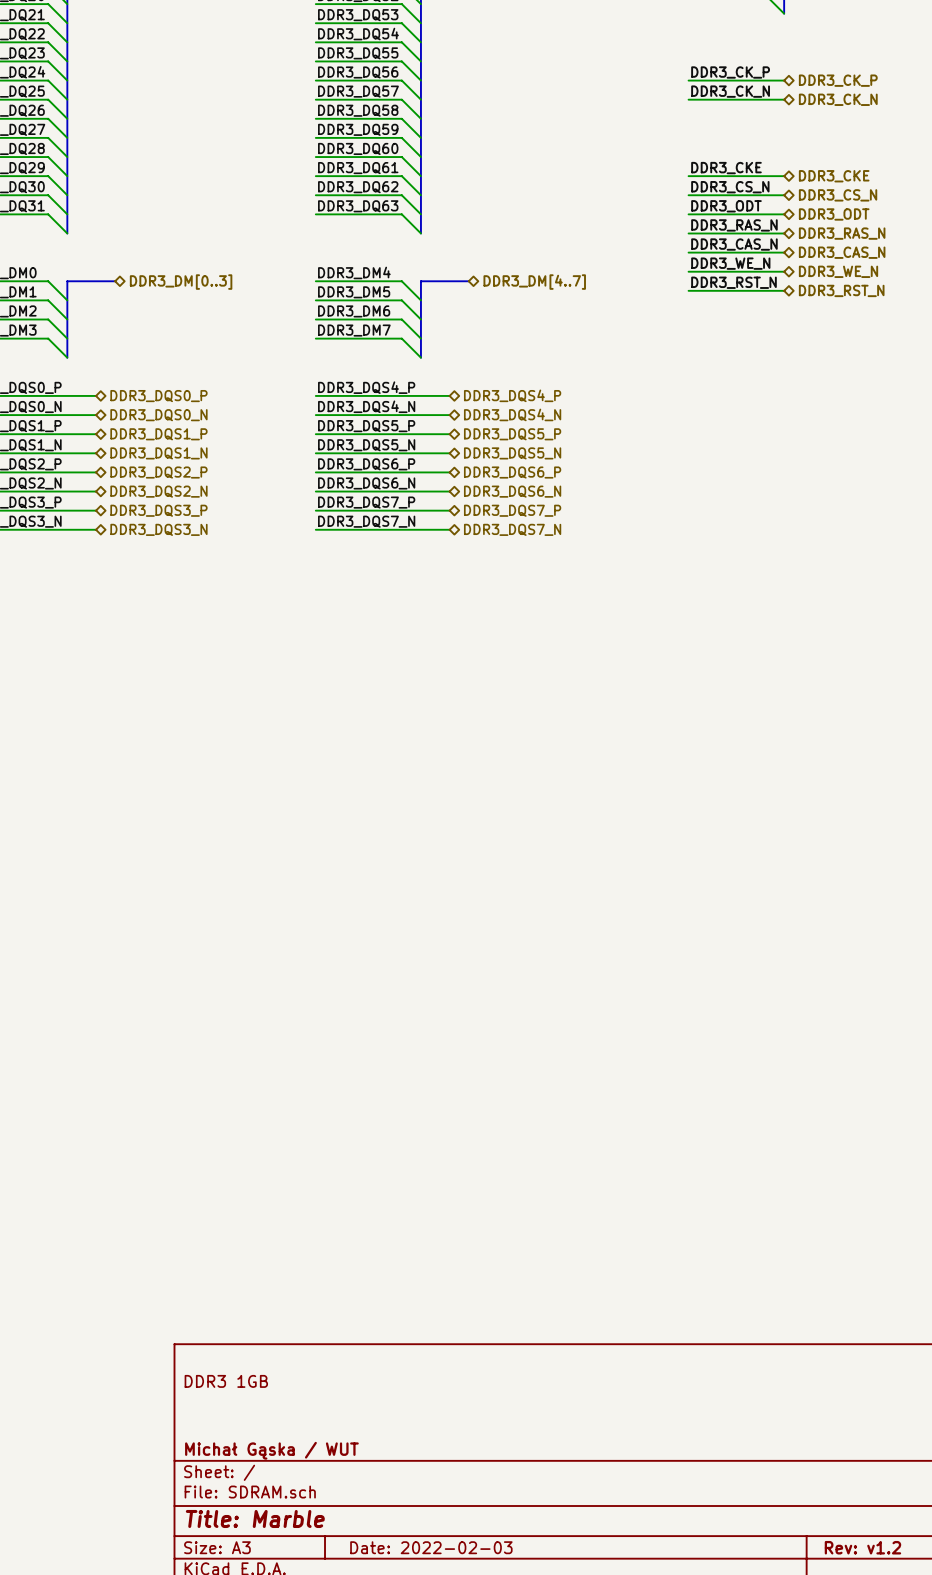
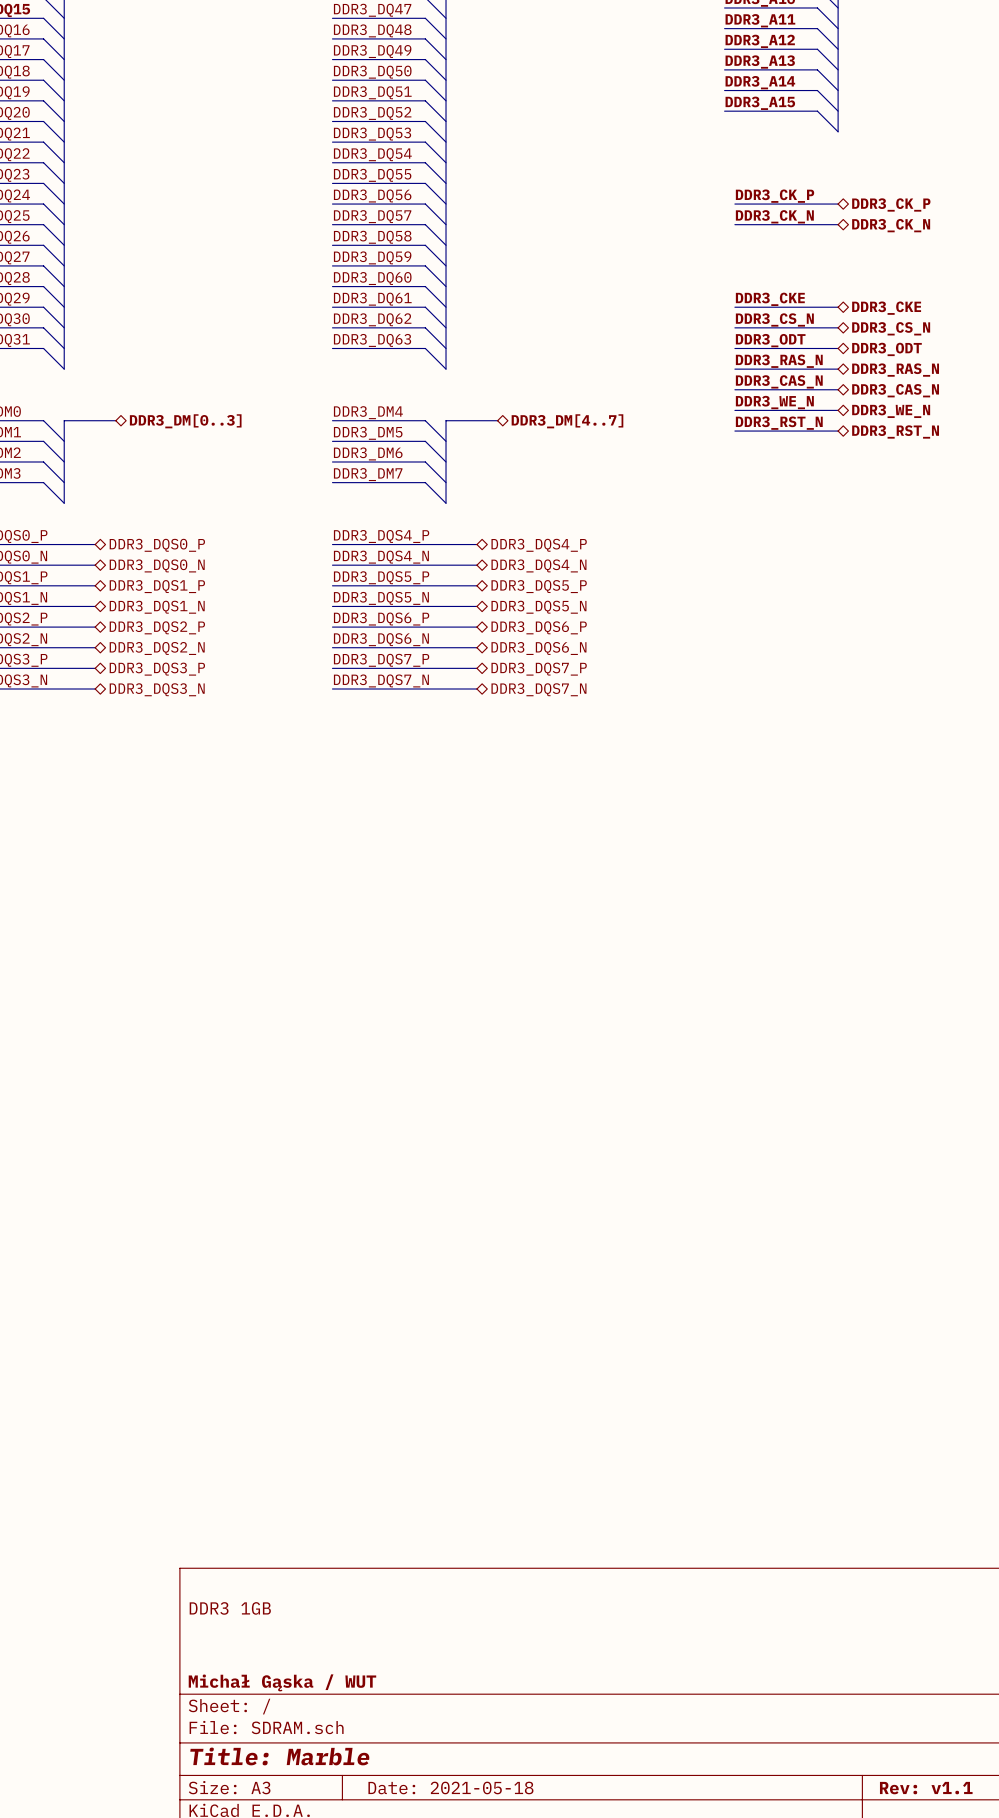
title block: Date: 2022-02-03 (431, 1547) -> Date: 2021-05-18 (450, 1787)
title block: Rev: v1.2 (862, 1547) -> Rev: v1.1 (926, 1788)

